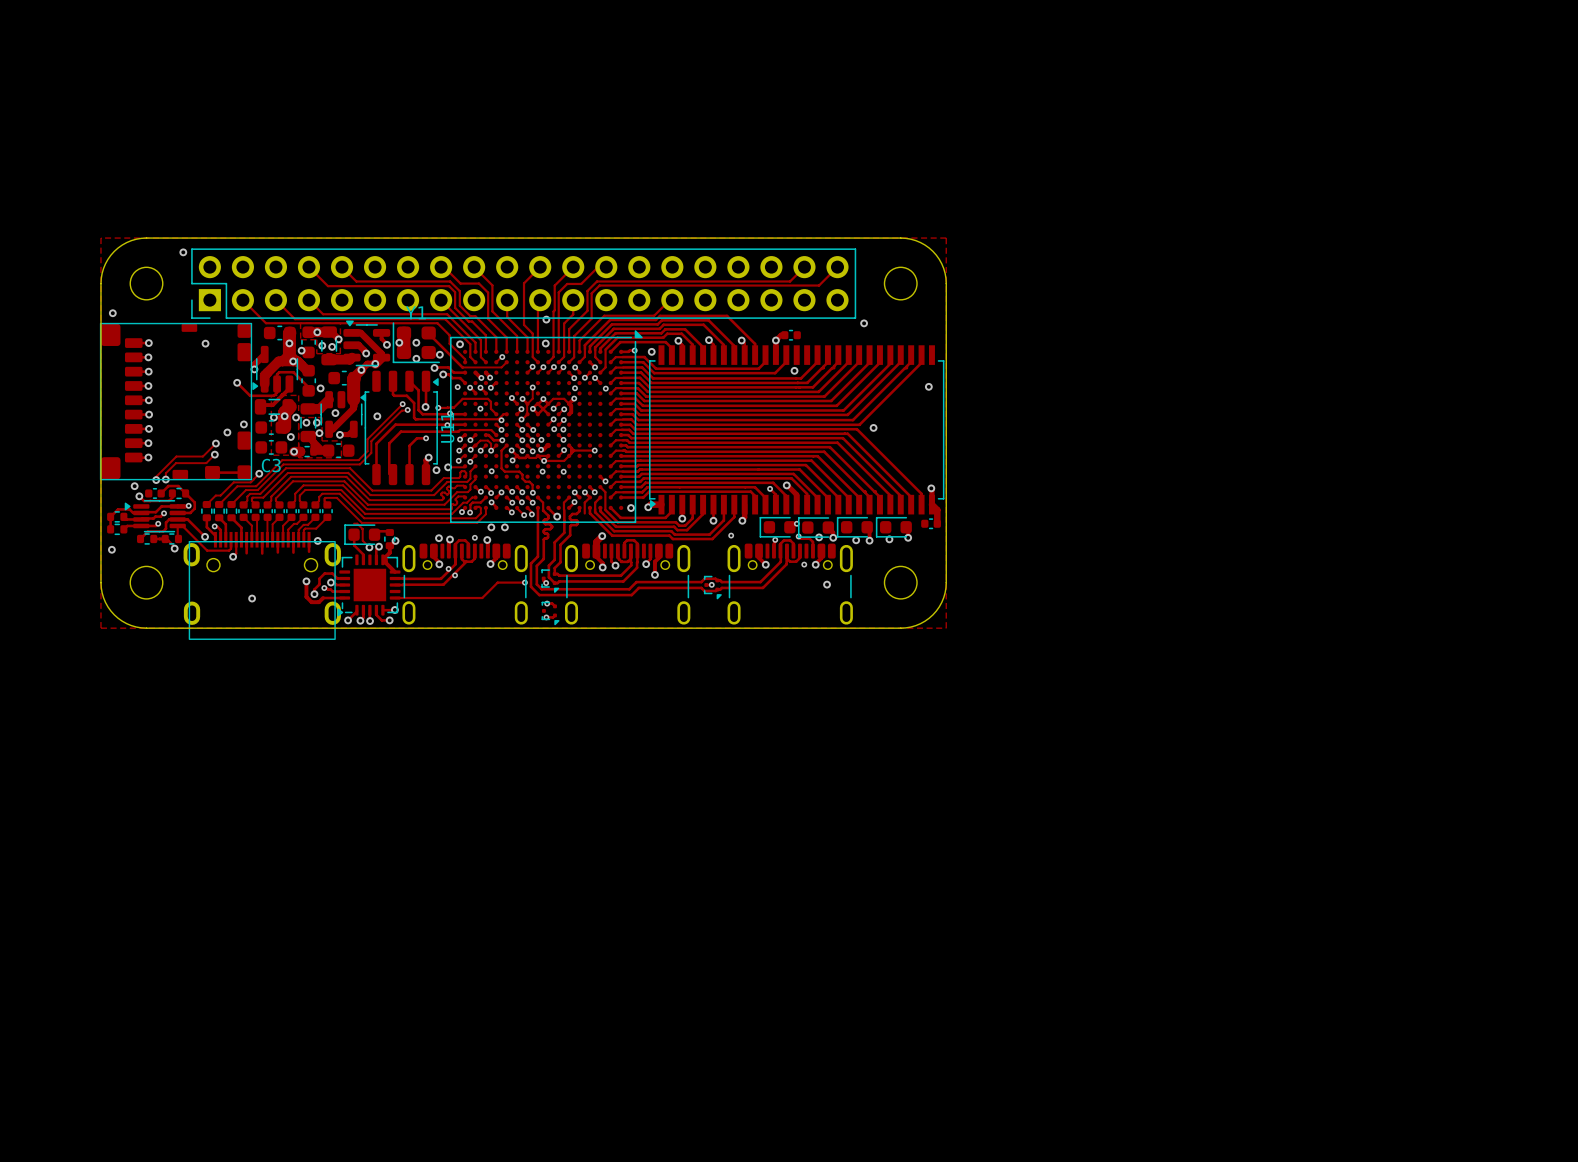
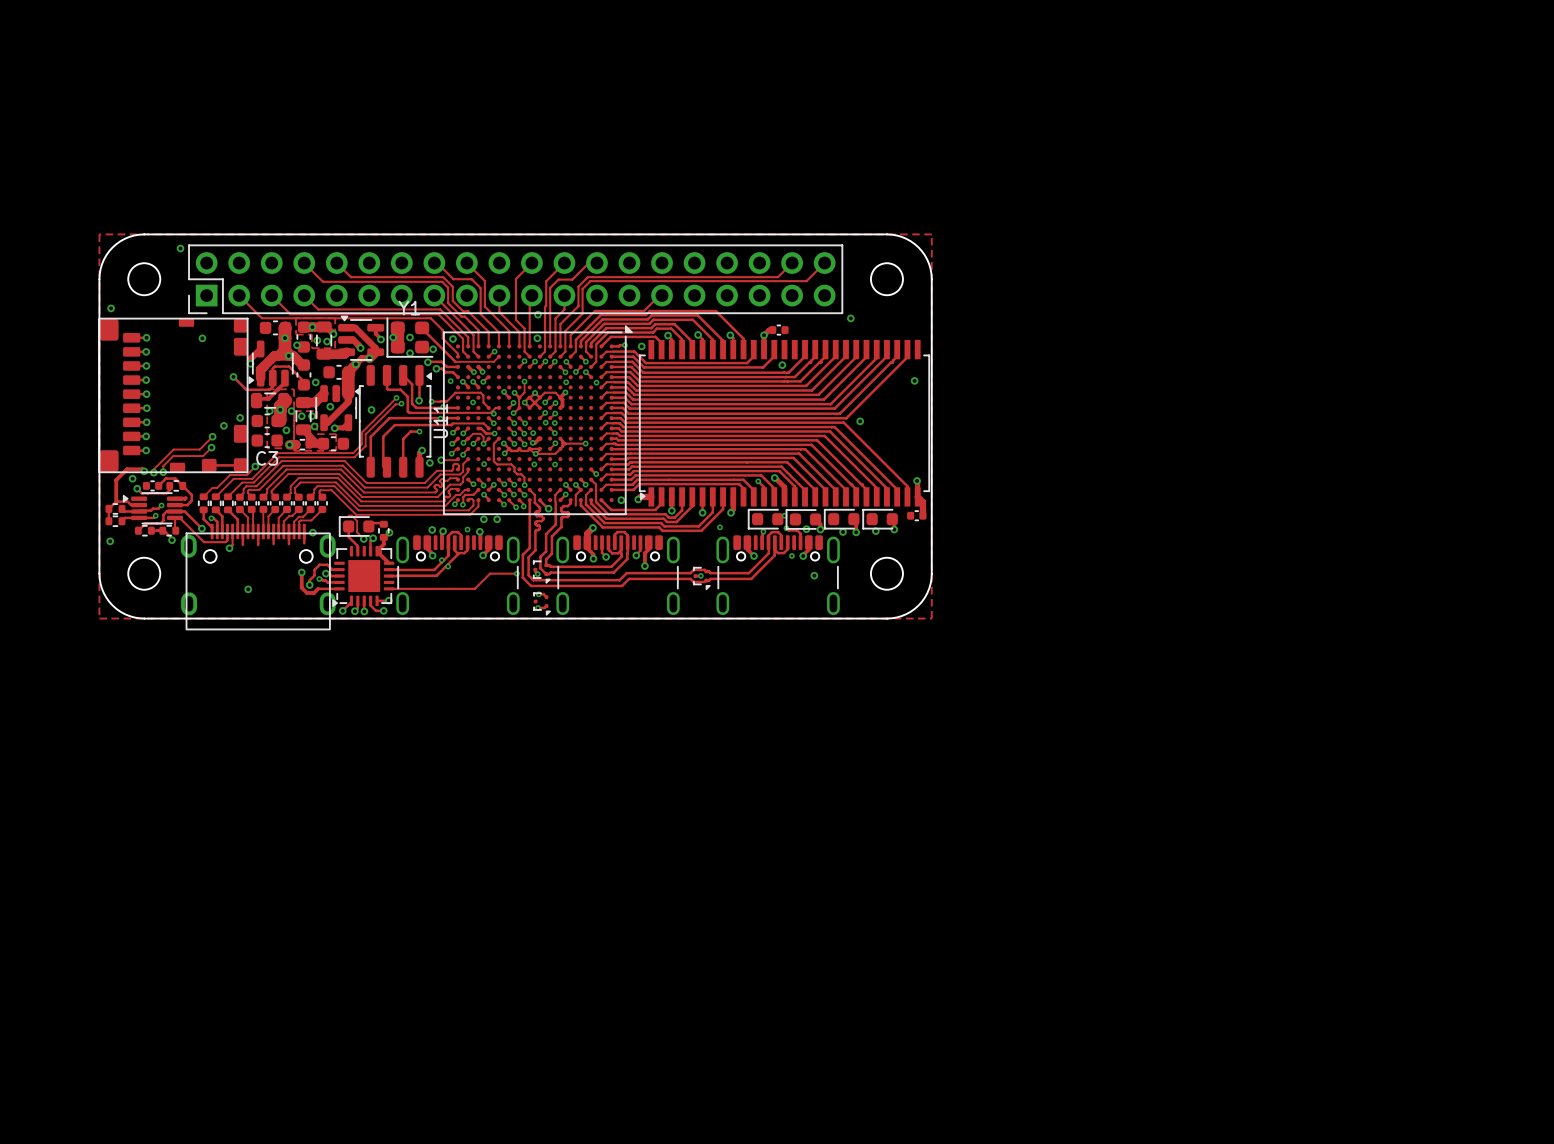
track: none -> (144, 471) (142, 469) (127, 469) (116, 480) (116, 501)
via: none -> (144, 471)
via: (188, 505) -> none
track: (179, 506) (161, 506) (155, 512) (143, 512) -> none

